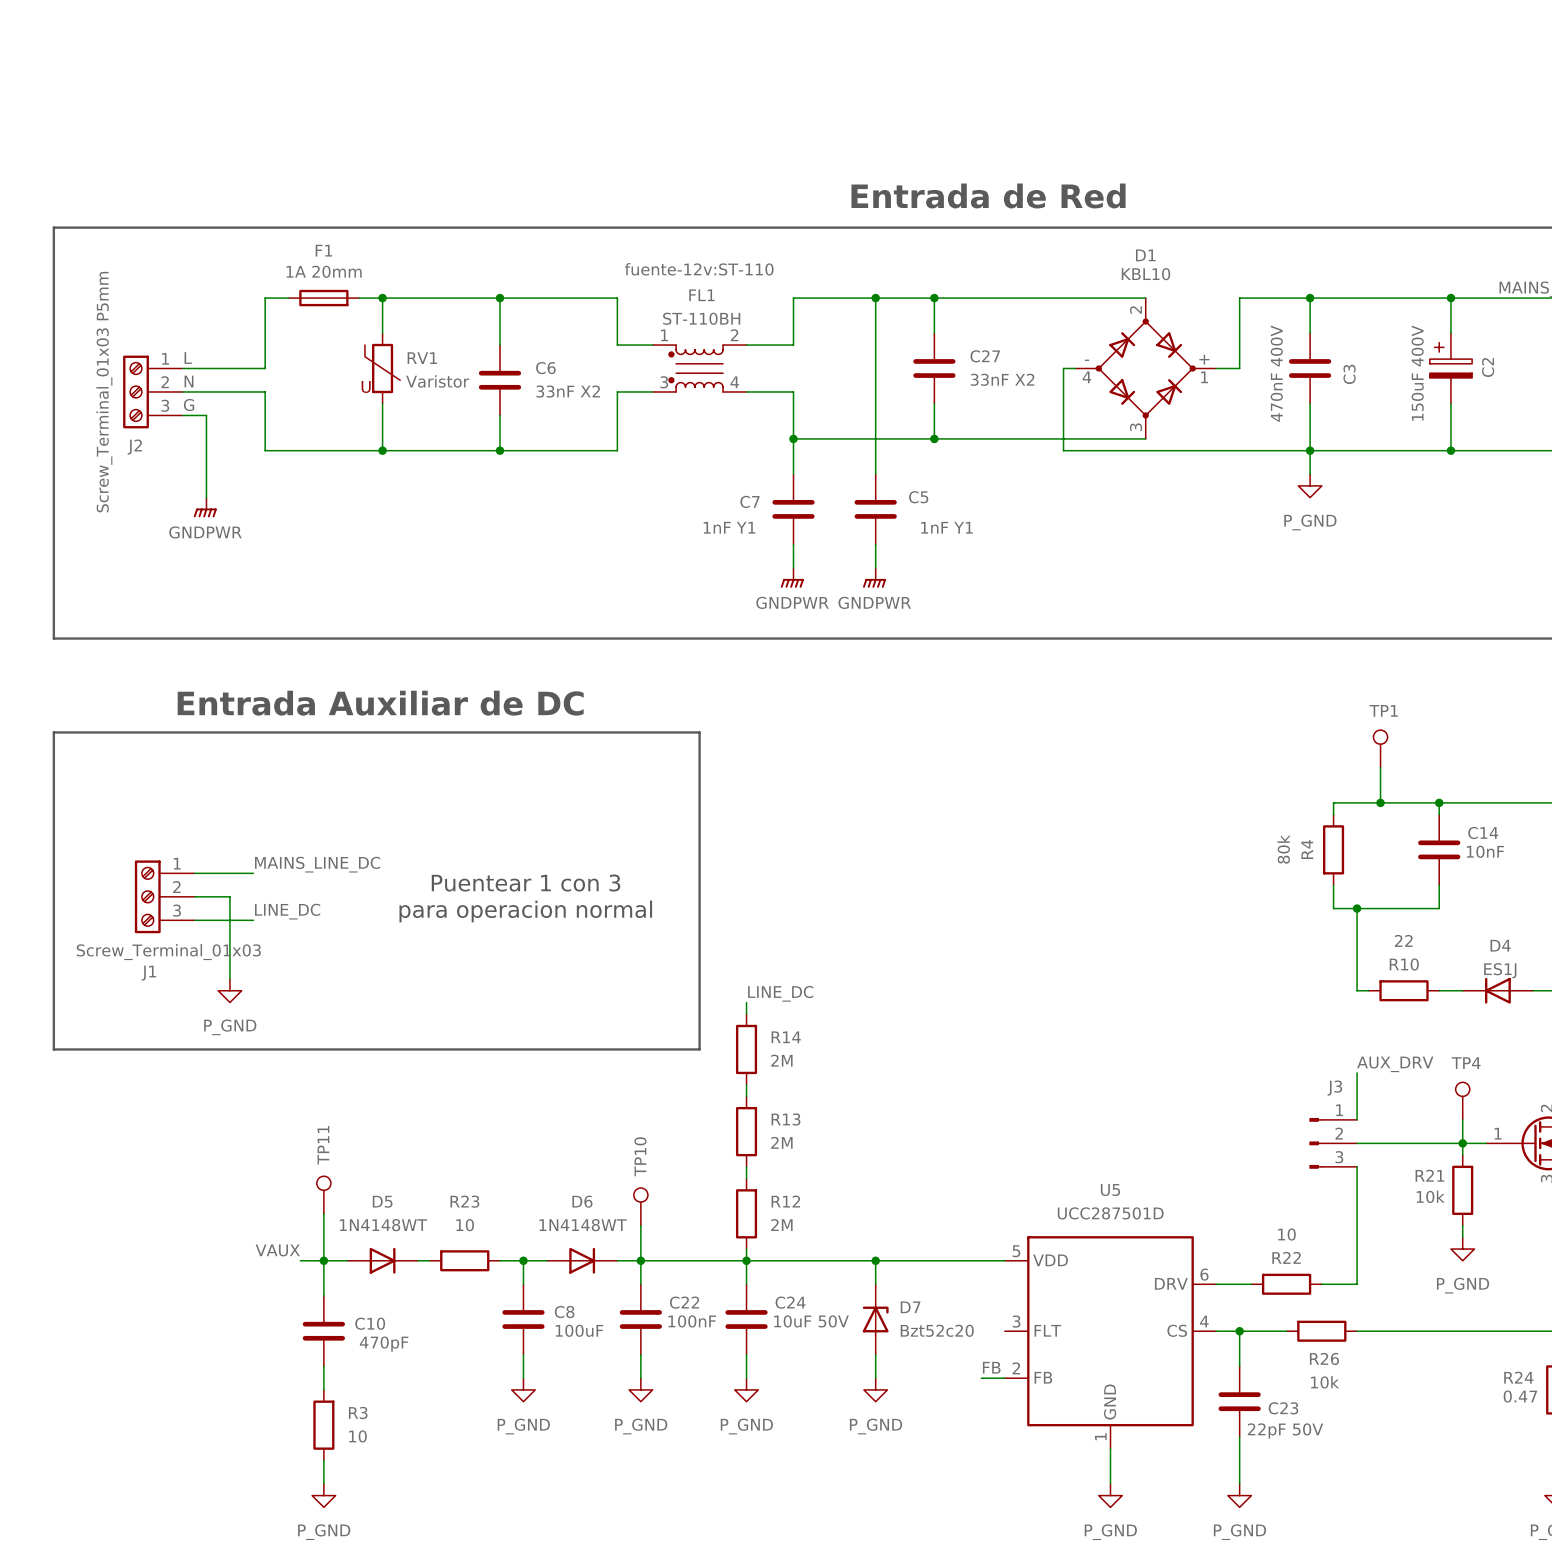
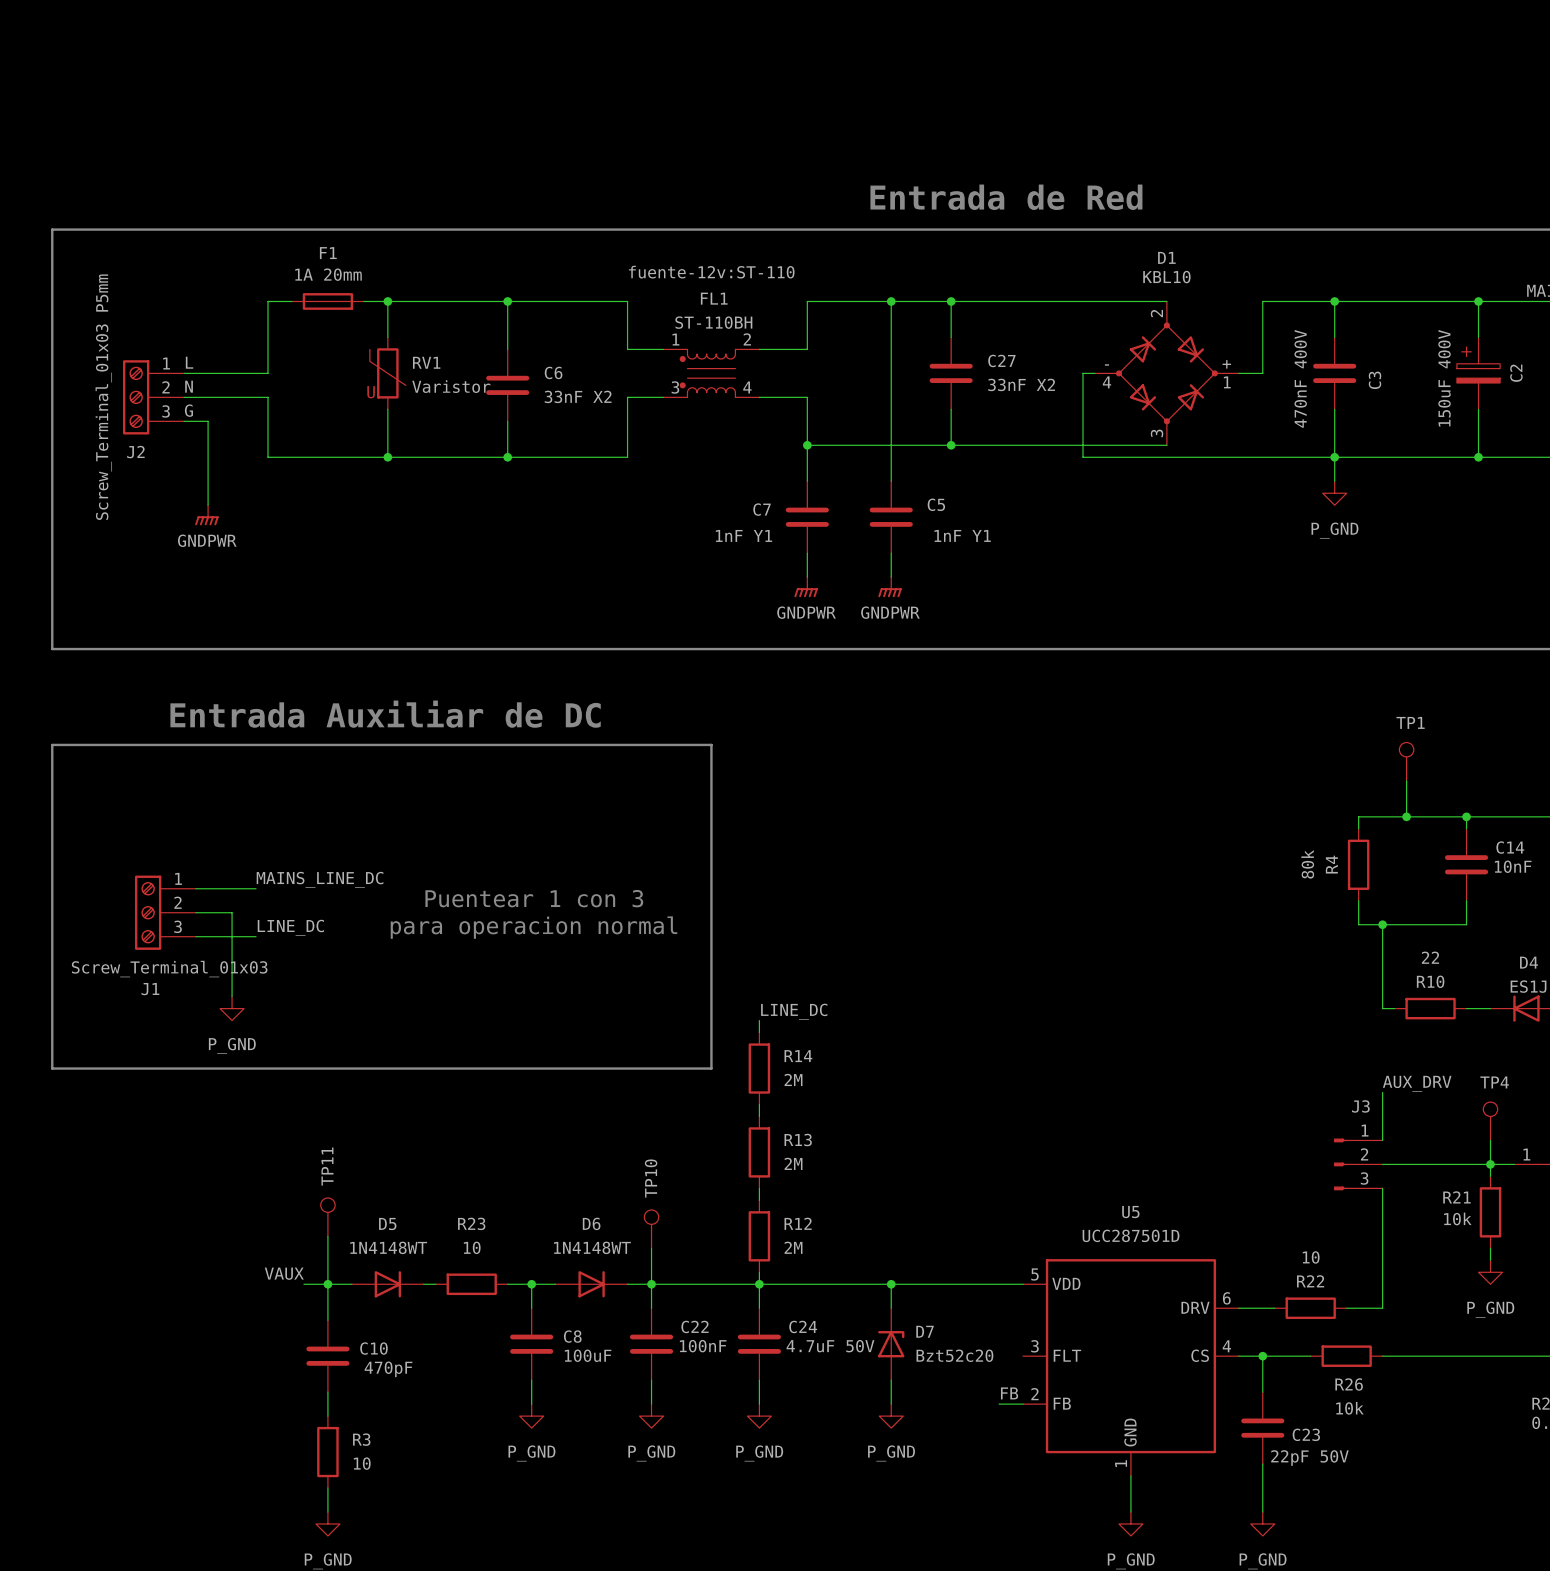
C24 value: 10uF 50V (811, 1321) -> 4.7uF 50V (830, 1346)

